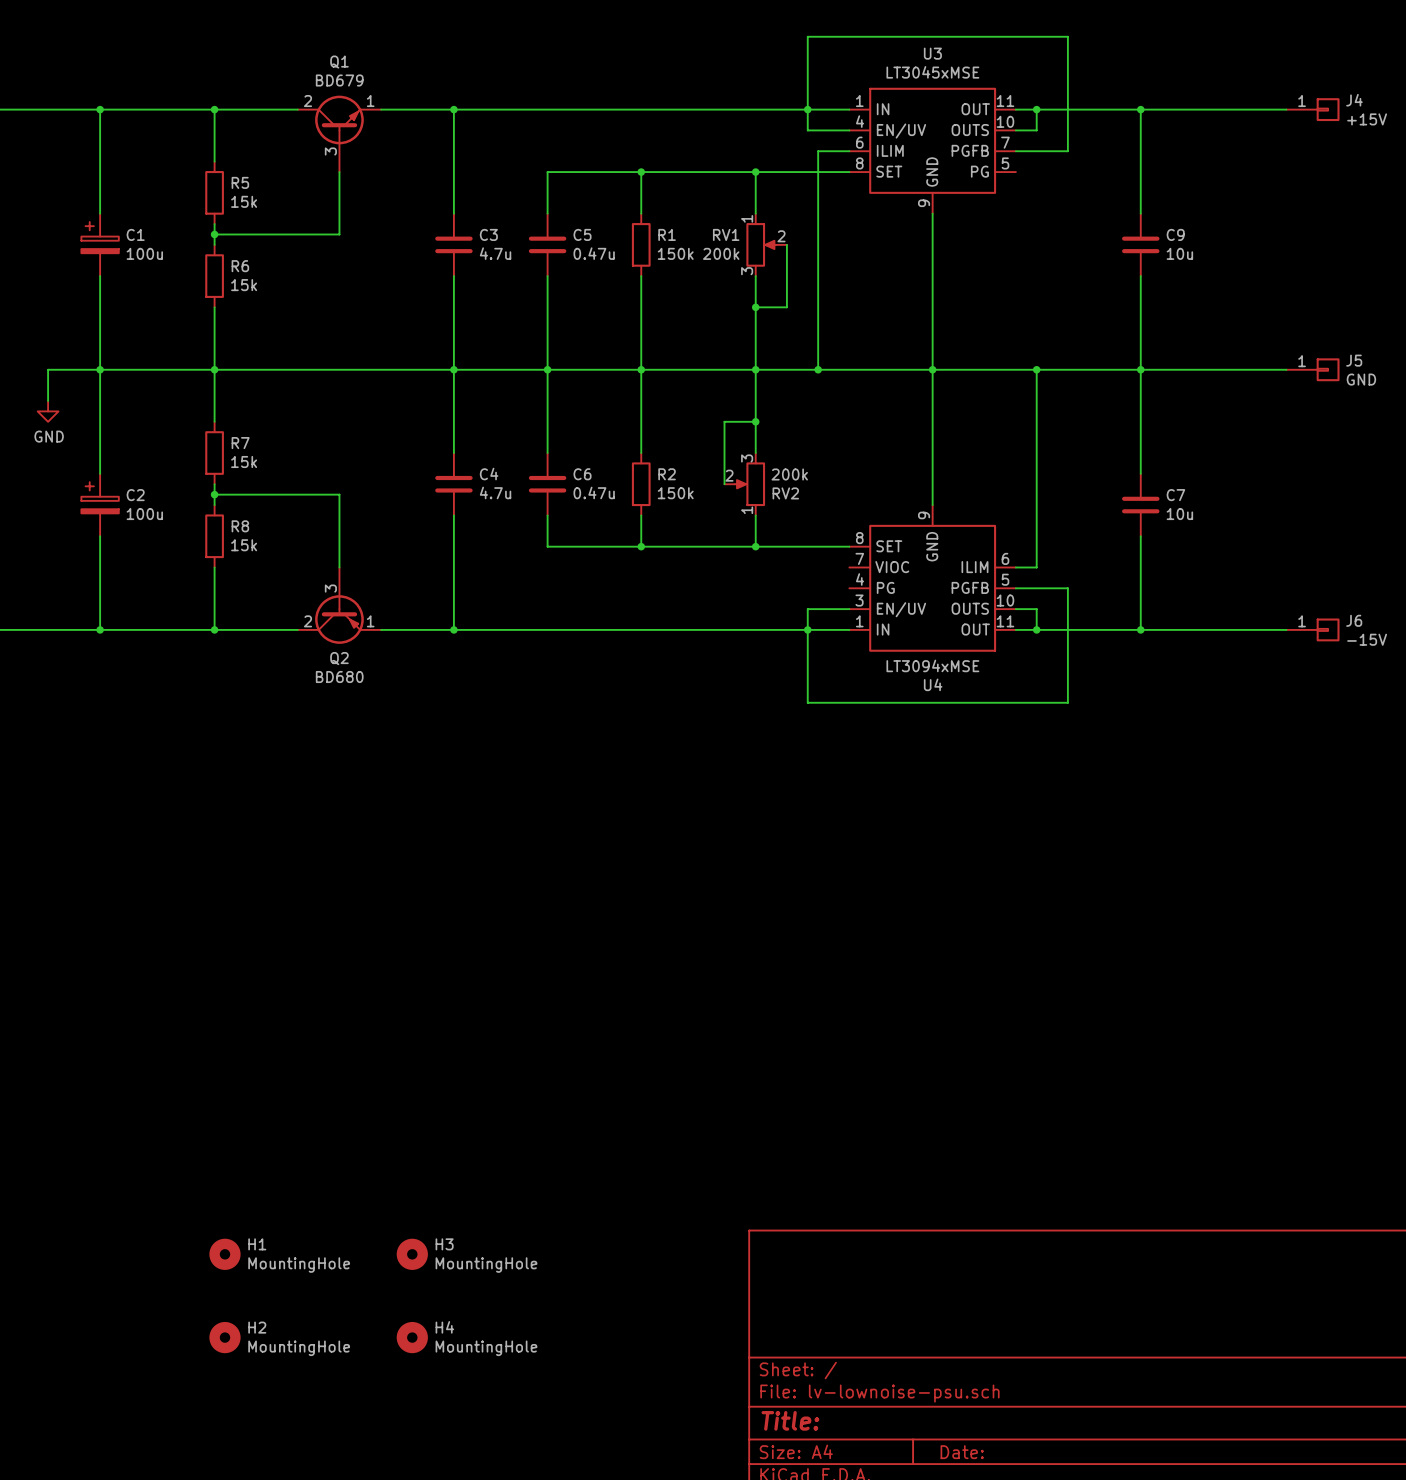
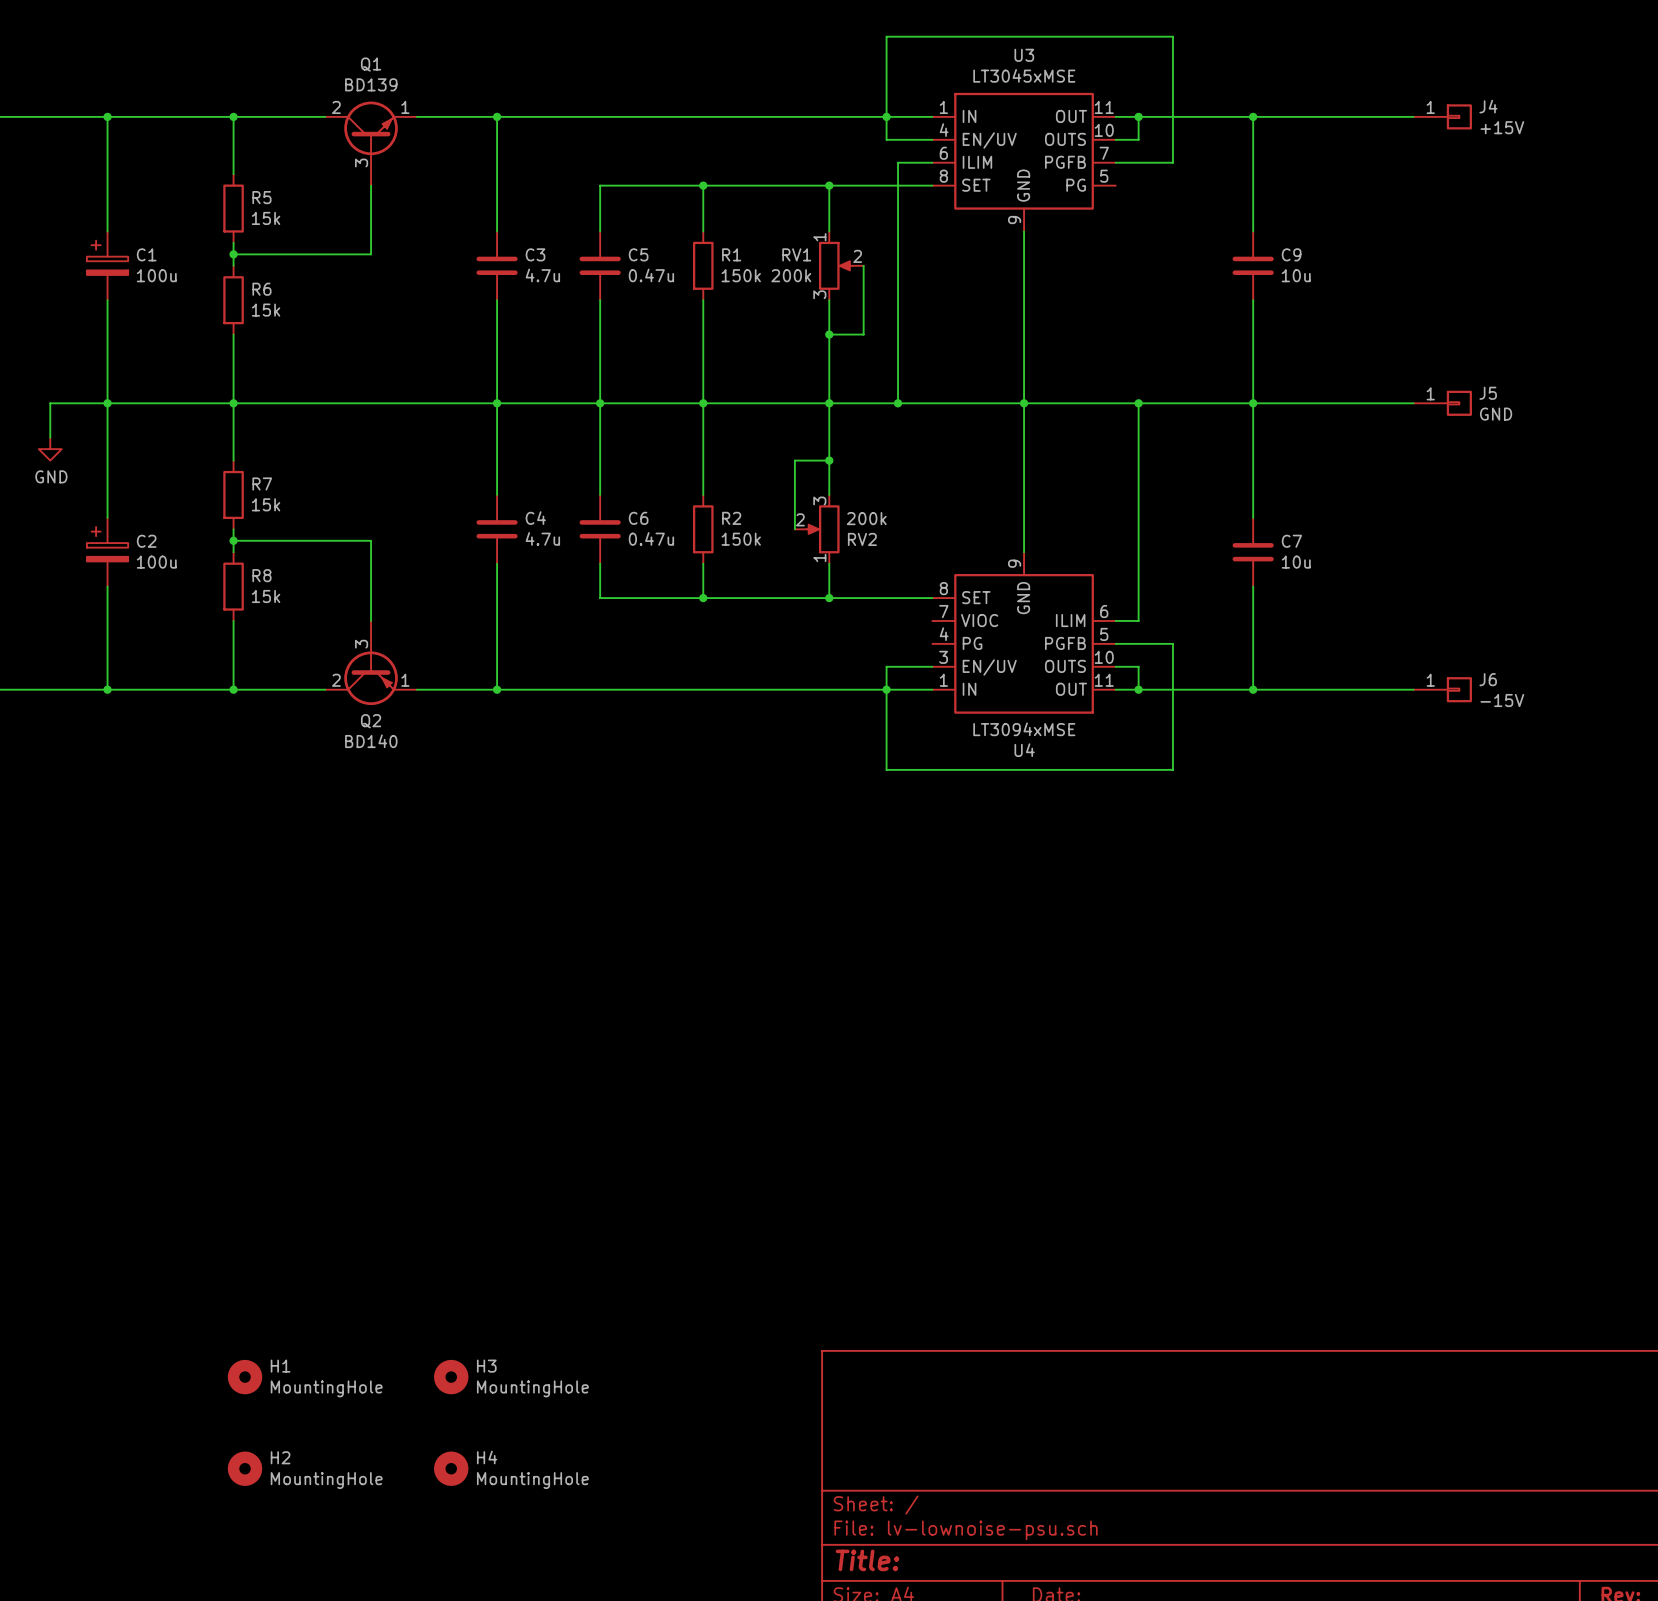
Q1 value: BD679 (339, 80) -> BD139 (371, 84)
Q2 value: BD680 (339, 677) -> BD140 (371, 741)

